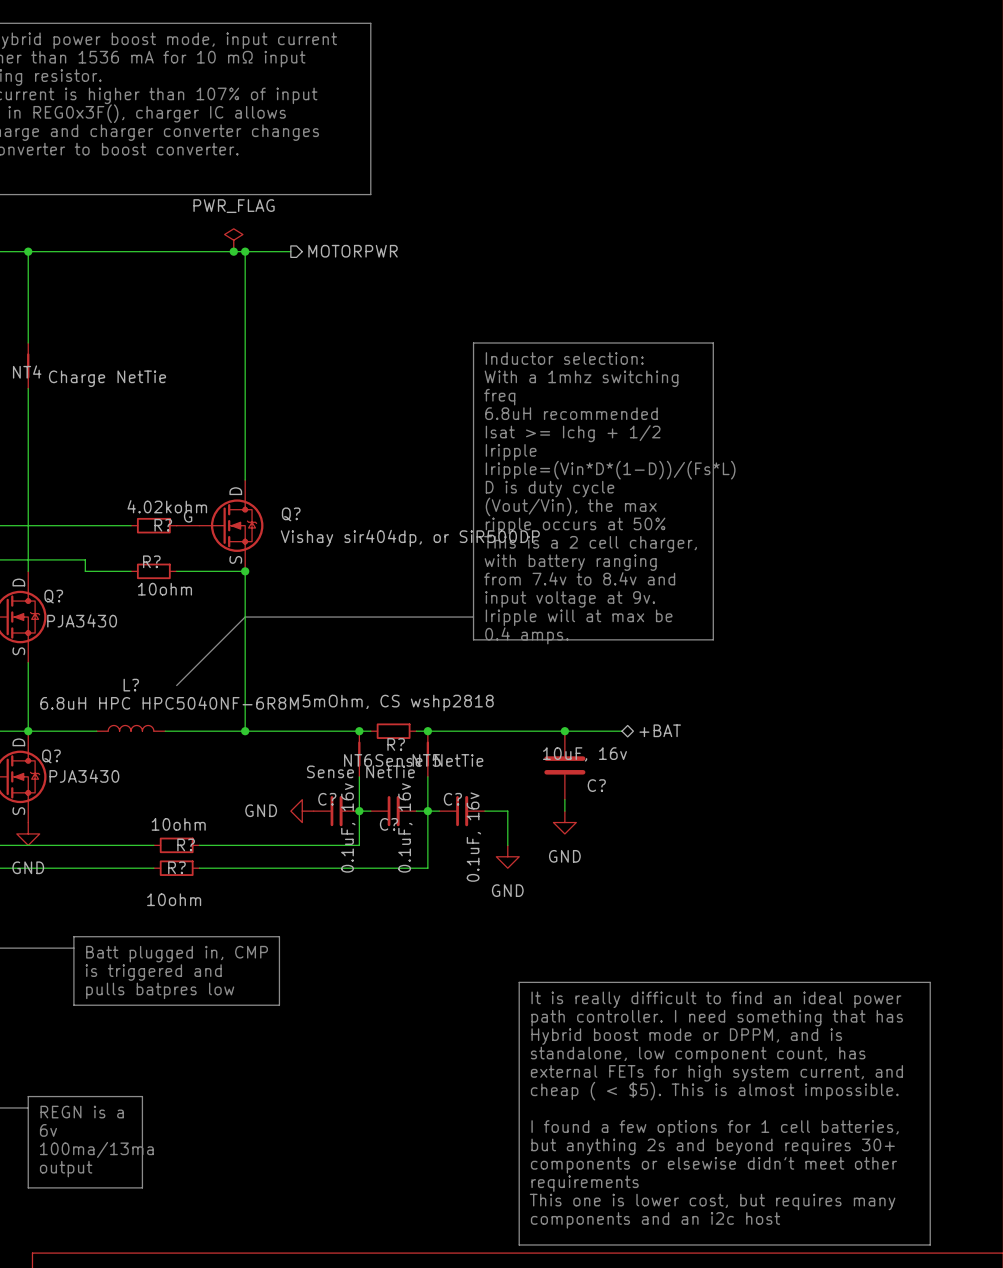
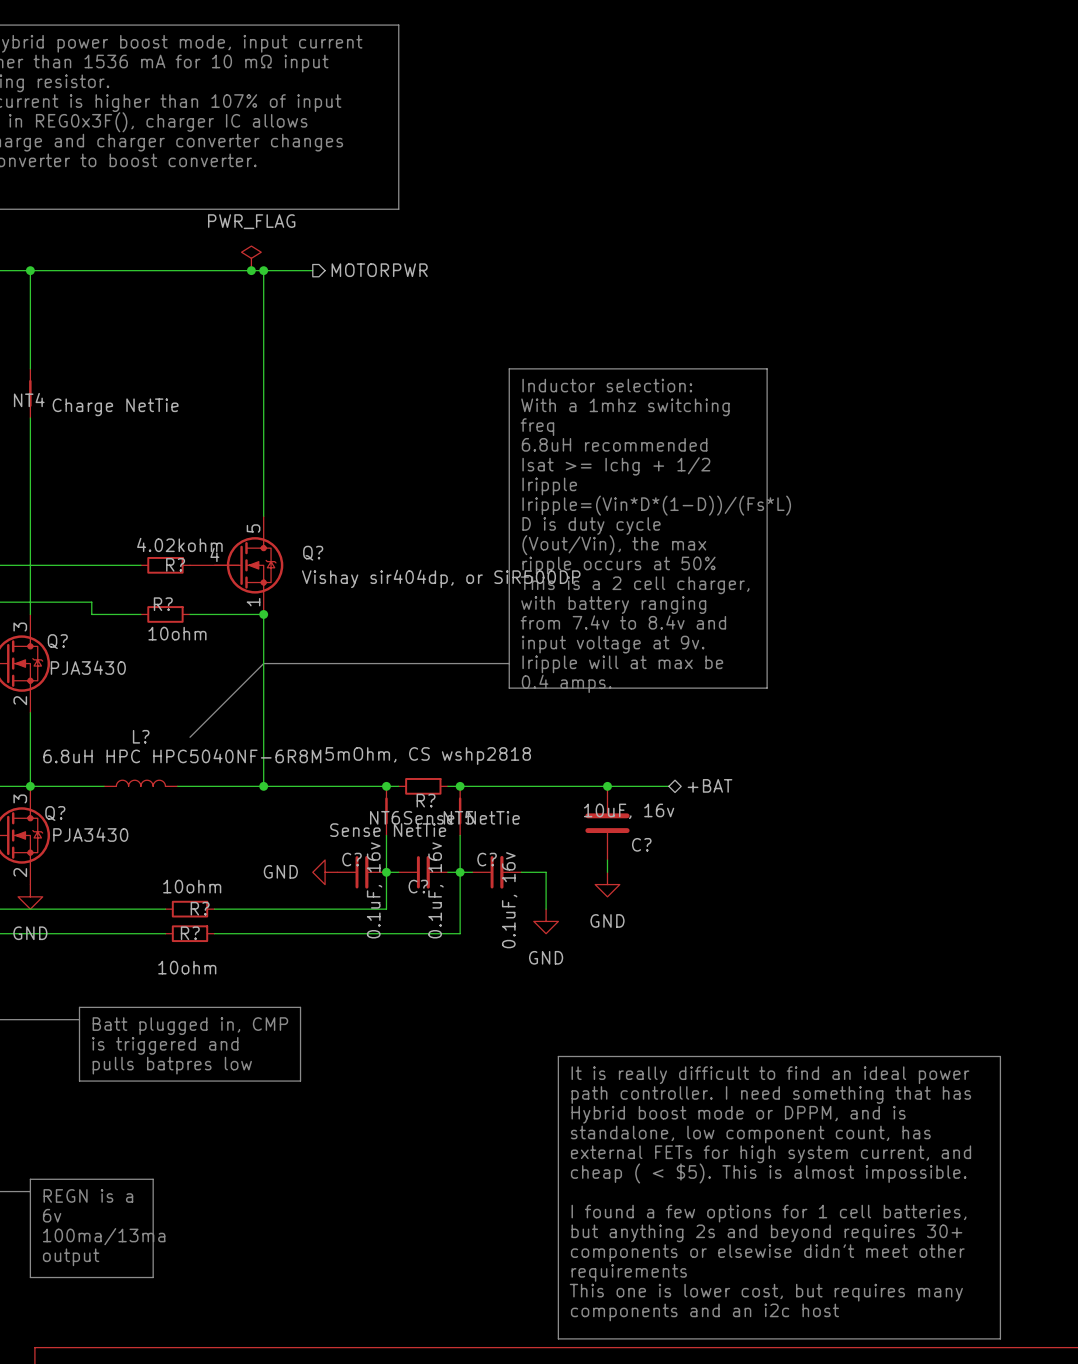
Q? symbol: [176, 480, 264, 572] -> [190, 516, 284, 615]
Q? pin name: D (18, 582) -> none
Q? pin number: none -> 3 (20, 627)
Q? pin name: S (18, 651) -> none
Q? pin number: none -> 2 (20, 700)
Q? pin name: D (18, 742) -> none
Q? pin number: none -> 3 (20, 798)
Q? pin name: S (18, 811) -> none
Q? pin number: none -> 2 (20, 872)

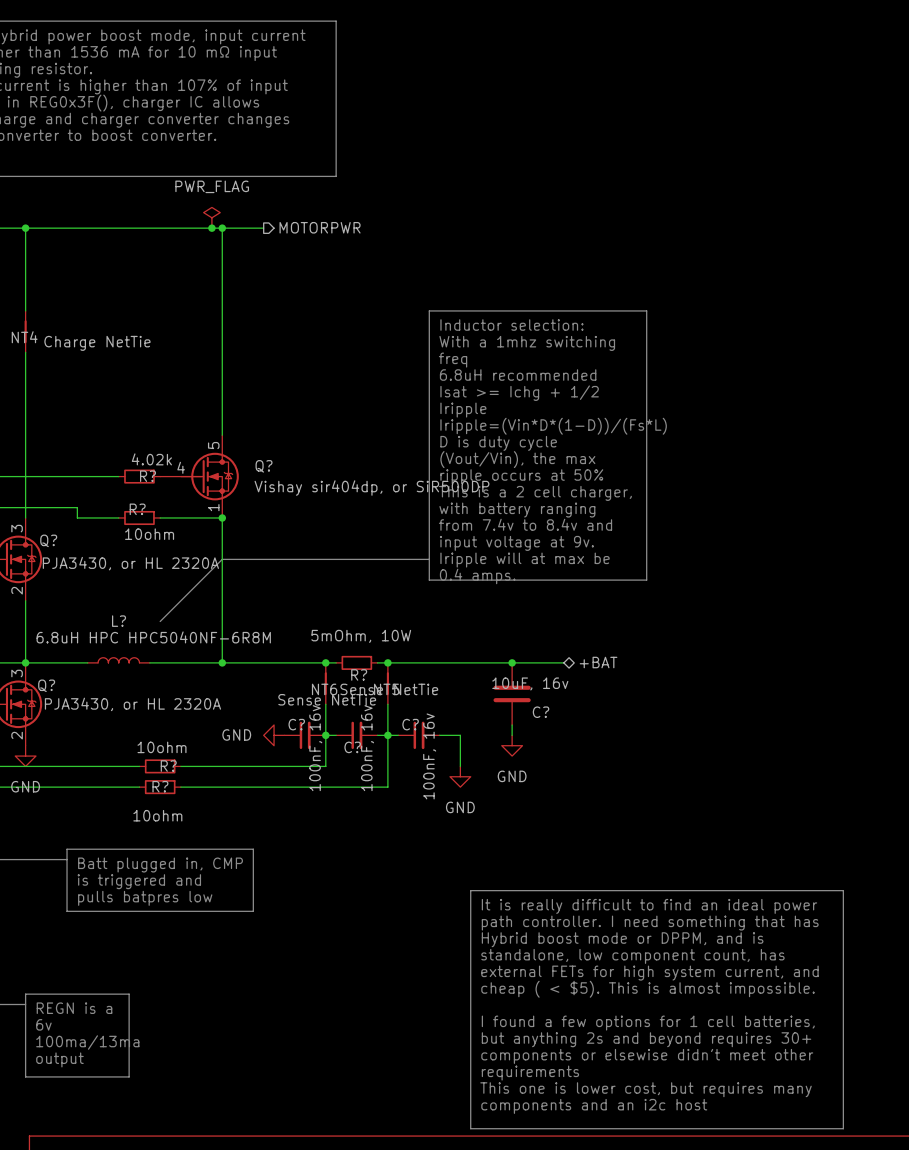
R? value: 4.02kohm (179, 544) -> 4.02k (151, 459)
Q? value: PJA3430 (88, 667) -> PJA3430, or HL 2320A (130, 563)
R? value: 5mOhm, CS wshp2818 (428, 756) -> 5mOhm, 10W (361, 636)
Q? value: PJA3430 (90, 834) -> PJA3430, or HL 2320A (132, 704)
C? value: 0.1uF, 16v (374, 890) -> 100nF, 16v (315, 748)
C? value: 0.1uF, 16v (436, 890) -> 100nF, 16v (367, 748)
C? value: 0.1uF, 16v (509, 900) -> 100nF, 16v (429, 756)

